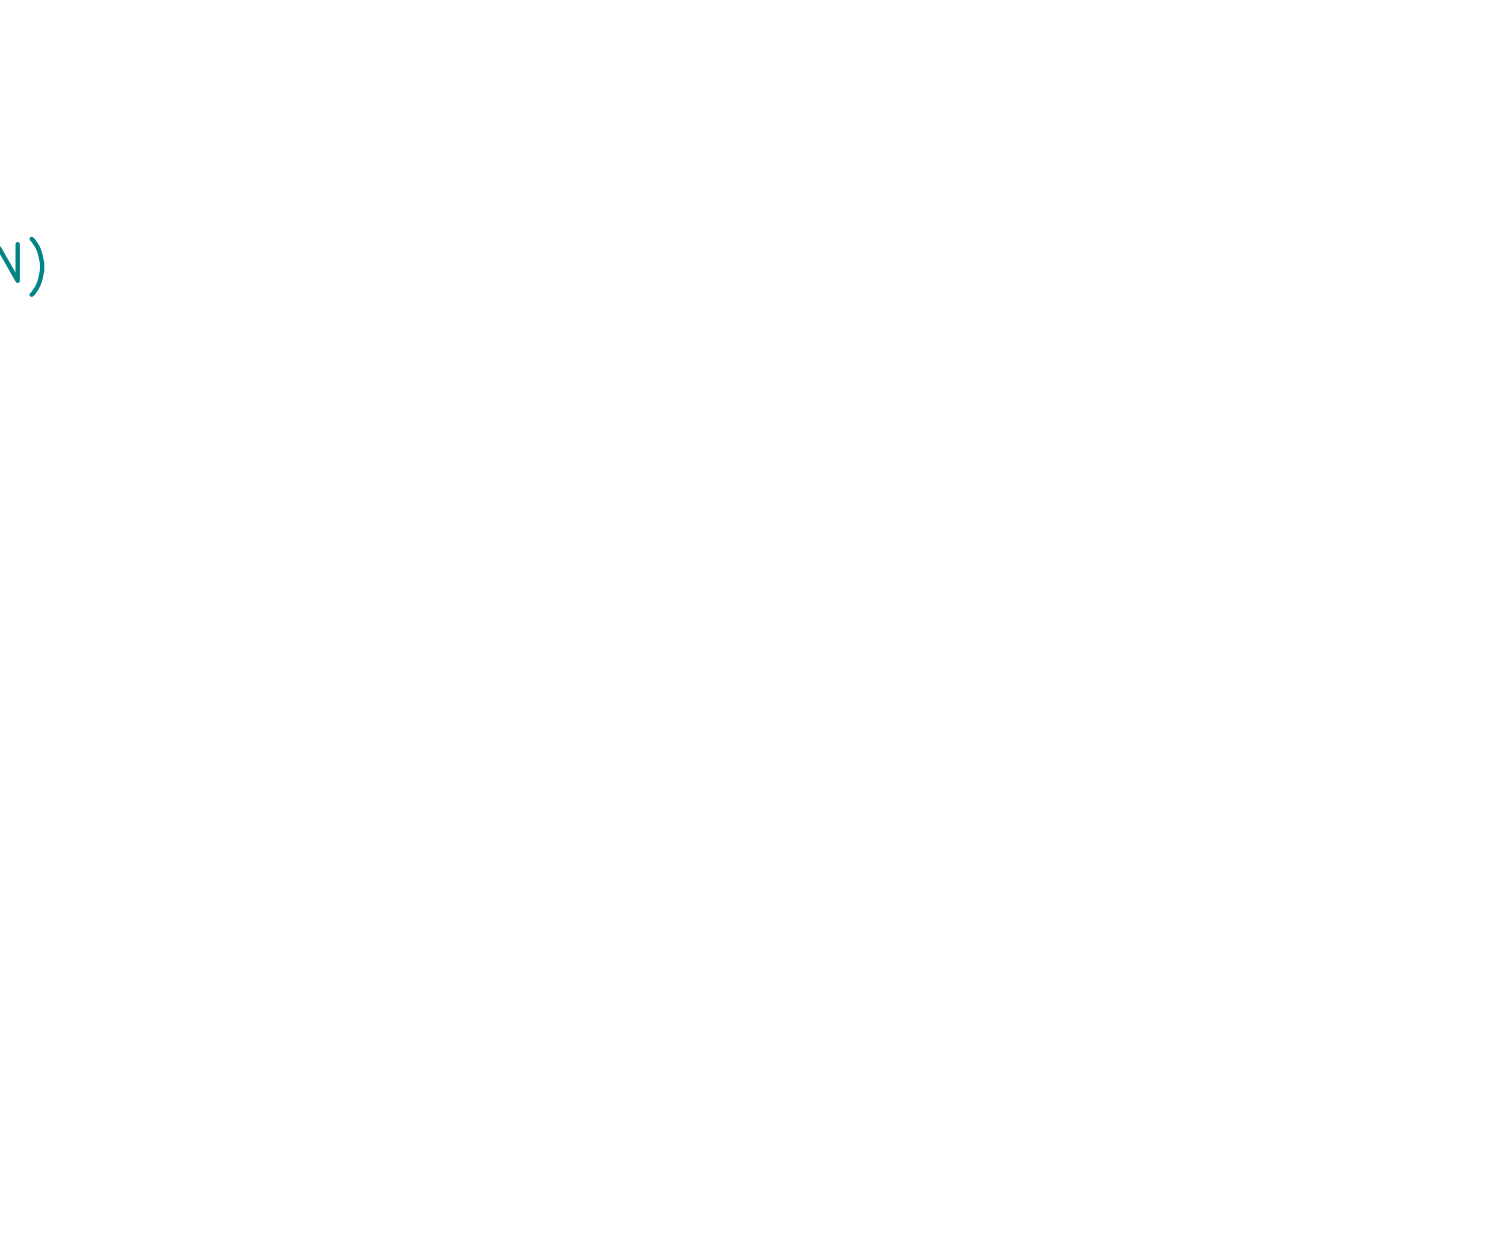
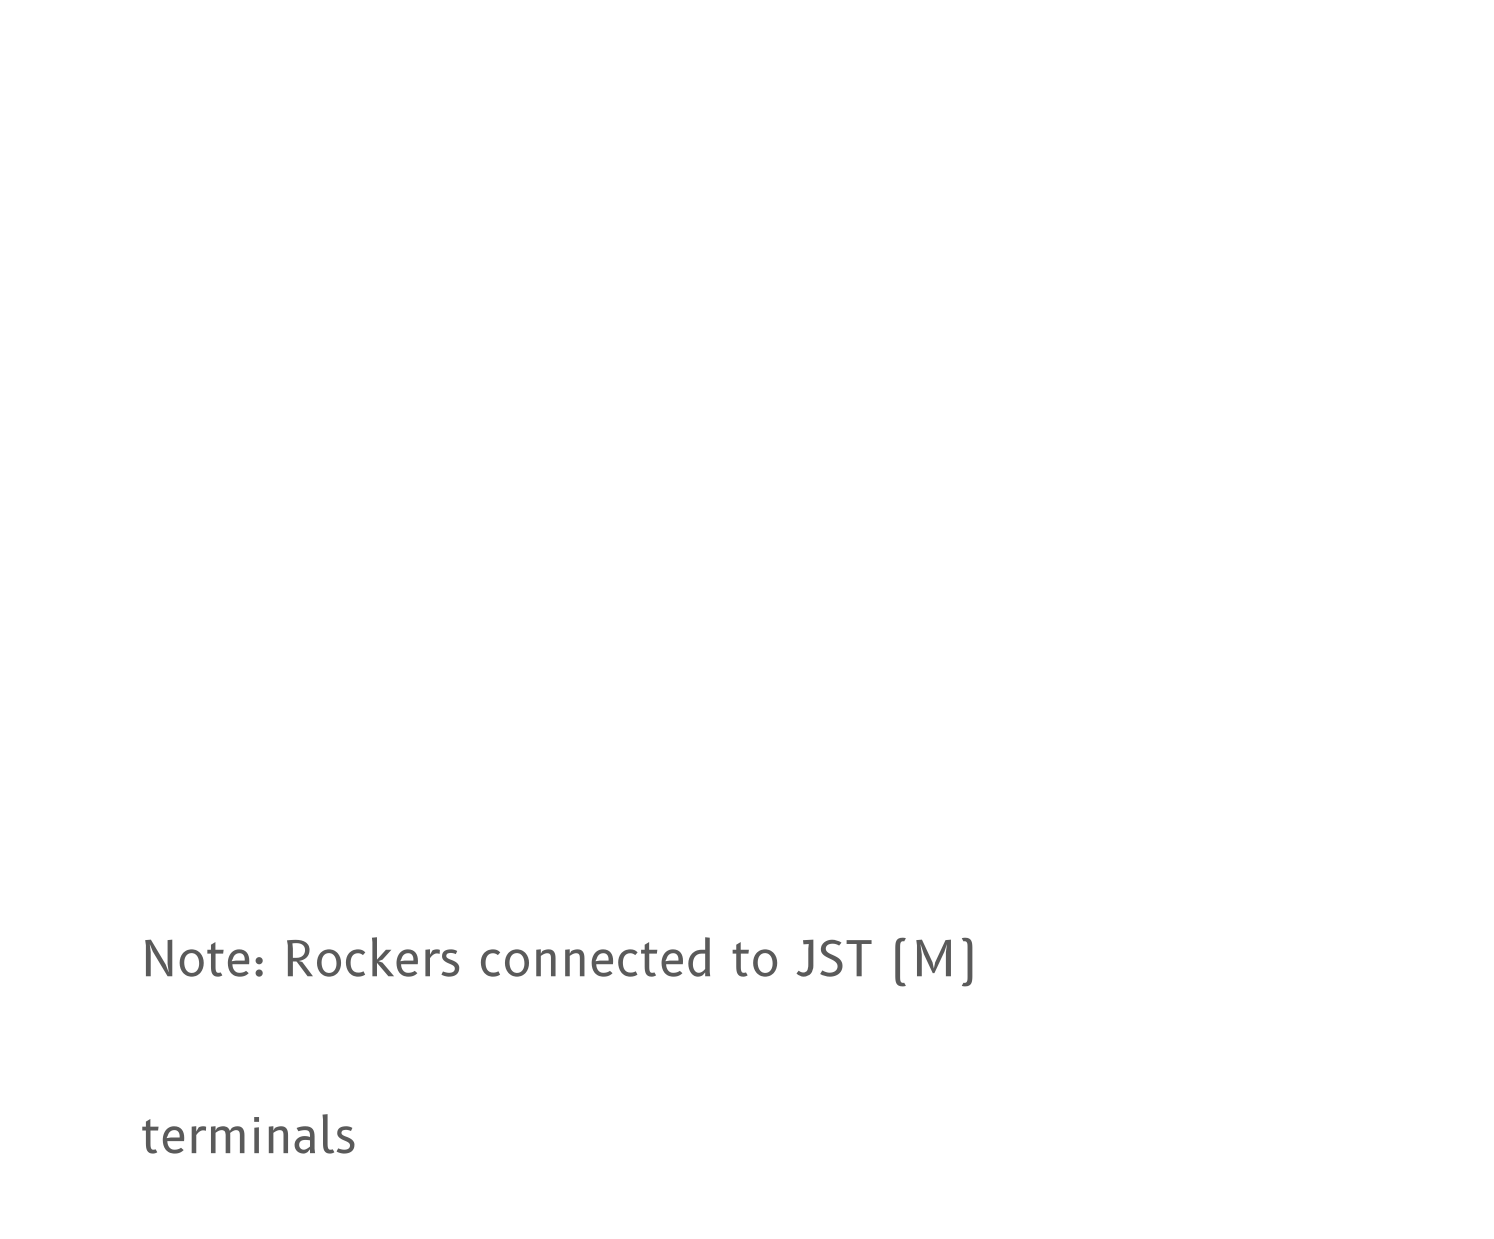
text: none -> Note: Rockers connected to JST (M) (558, 961)
text: none -> terminals (248, 1133)

